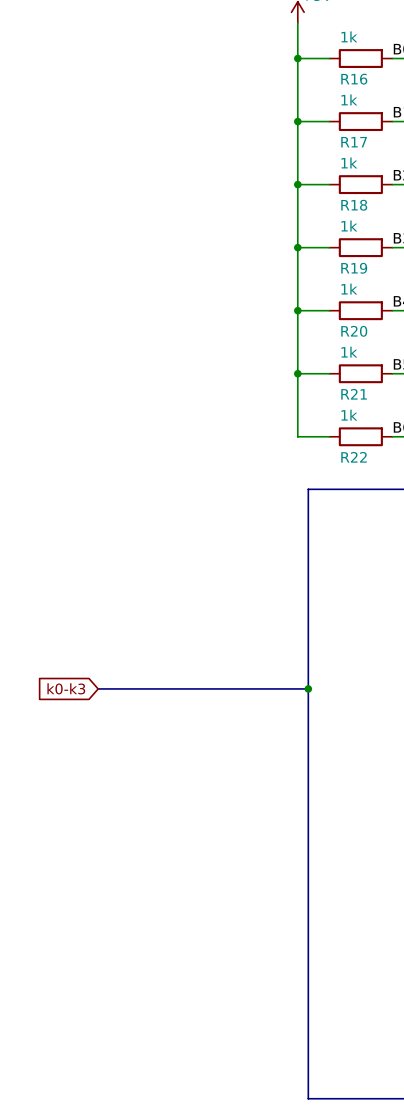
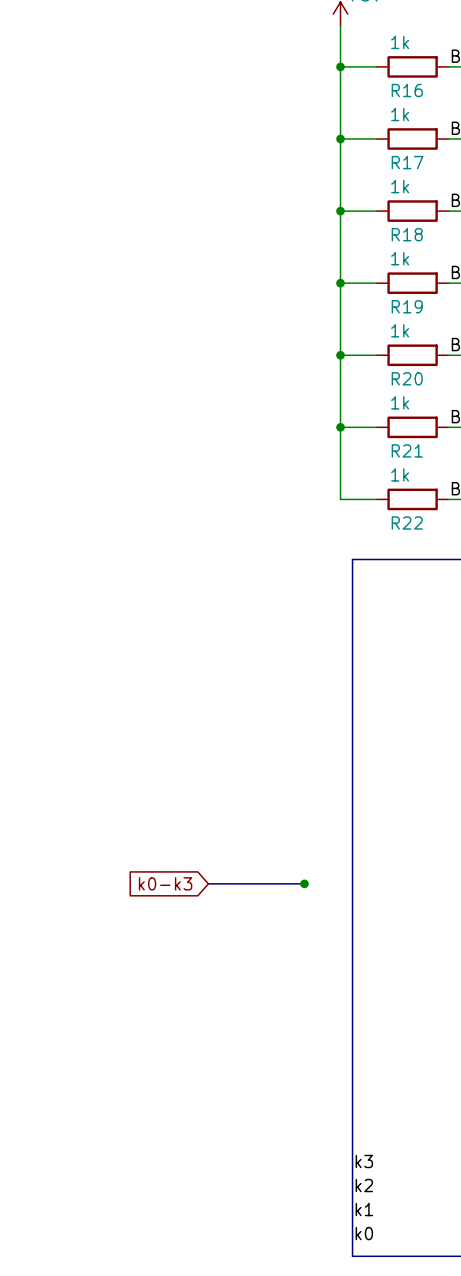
global label position: k0-k3 (66, 688) -> k0-k3 (165, 883)
bus: (98, 688) (308, 688) -> none
junction: (308, 688) -> none
bus: none -> (208, 883) (304, 883)
junction: none -> (304, 883)
label: none -> k3 (364, 1161)
label: none -> k2 (364, 1185)
label: none -> k1 (364, 1209)
label: none -> k0 (364, 1233)

